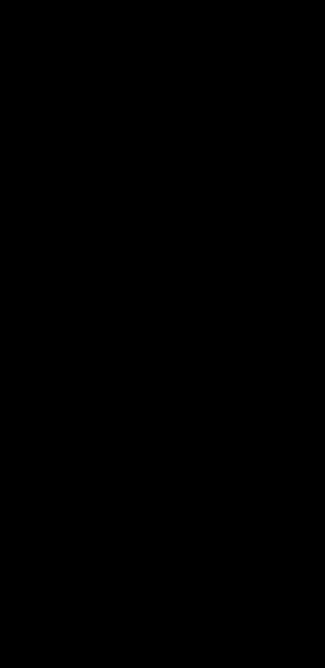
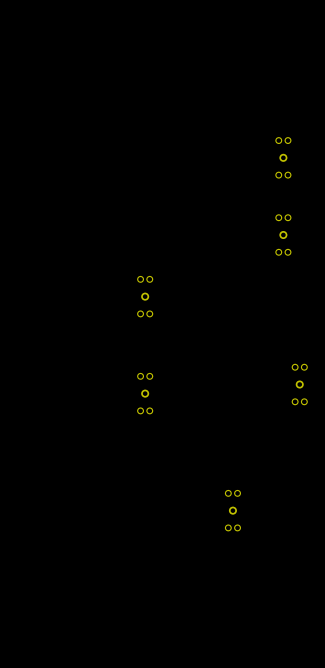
part: none -> (283, 157)
part: none -> (283, 235)
part: none -> (145, 296)
part: none -> (299, 384)
part: none -> (145, 393)
part: none -> (232, 510)

